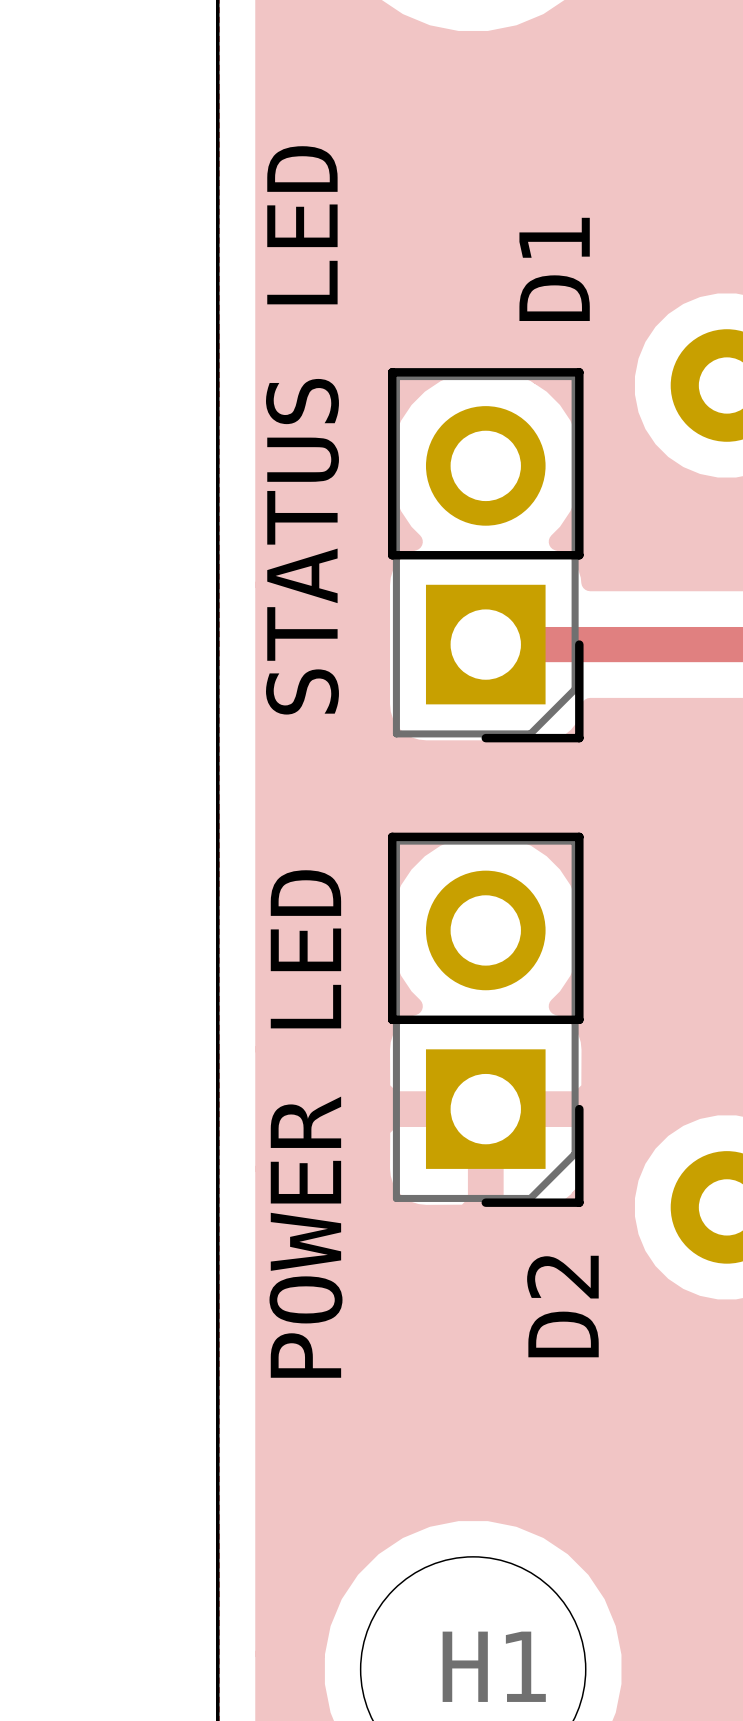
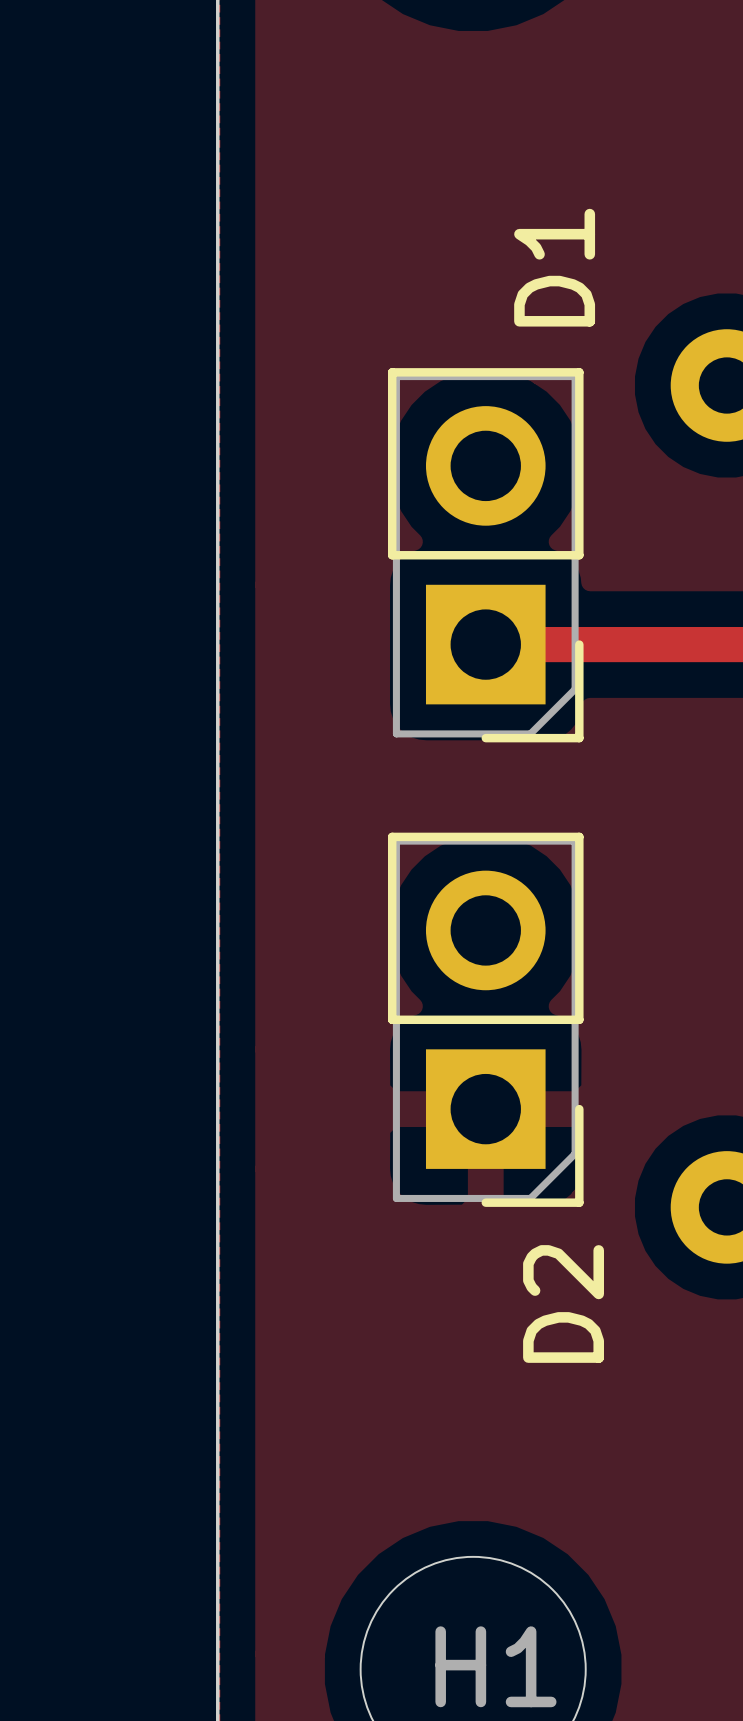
D1 value: STATUS LED (302, 430) -> none
D2 value: POWER LED (306, 1124) -> none

